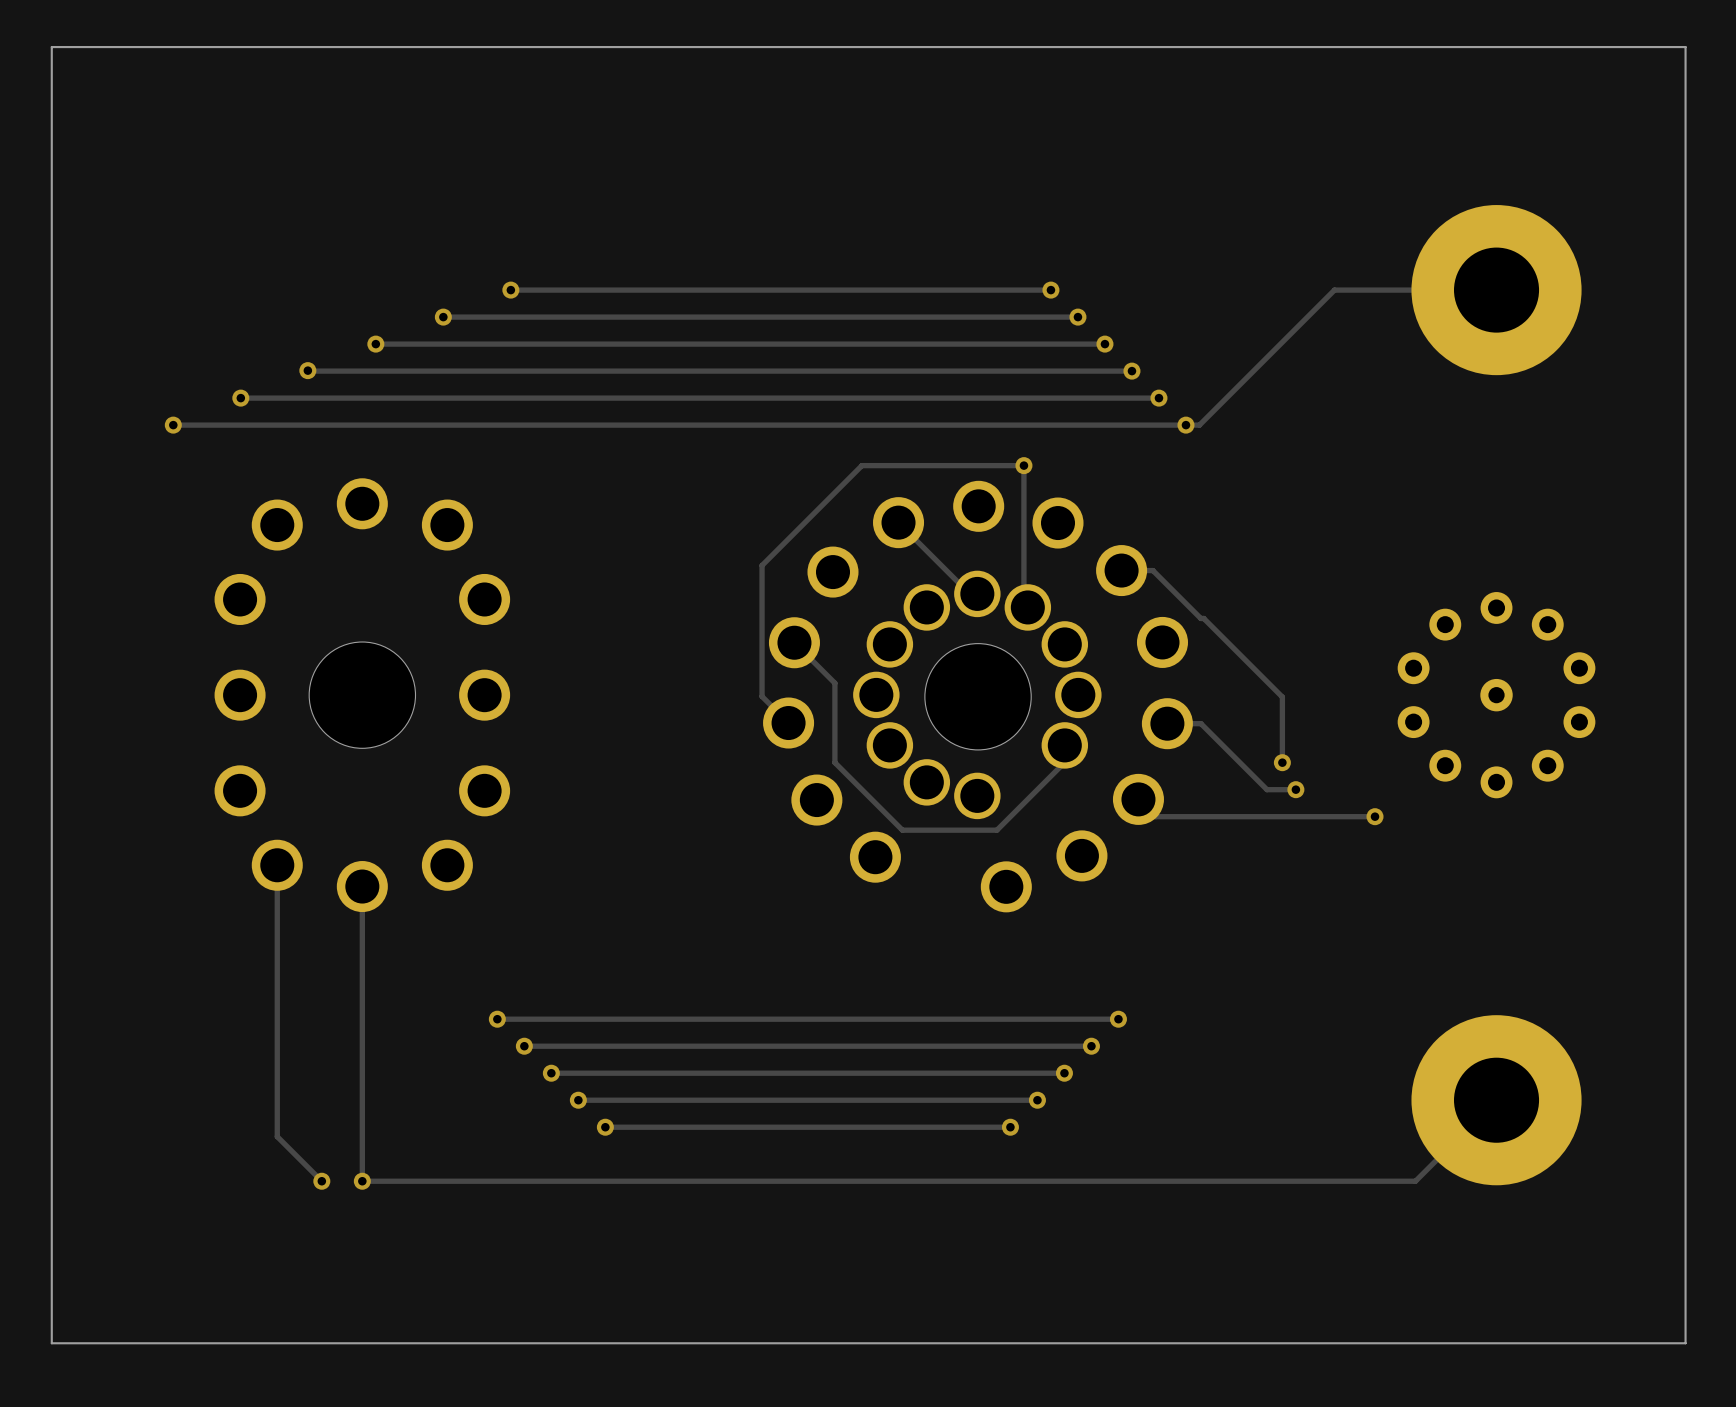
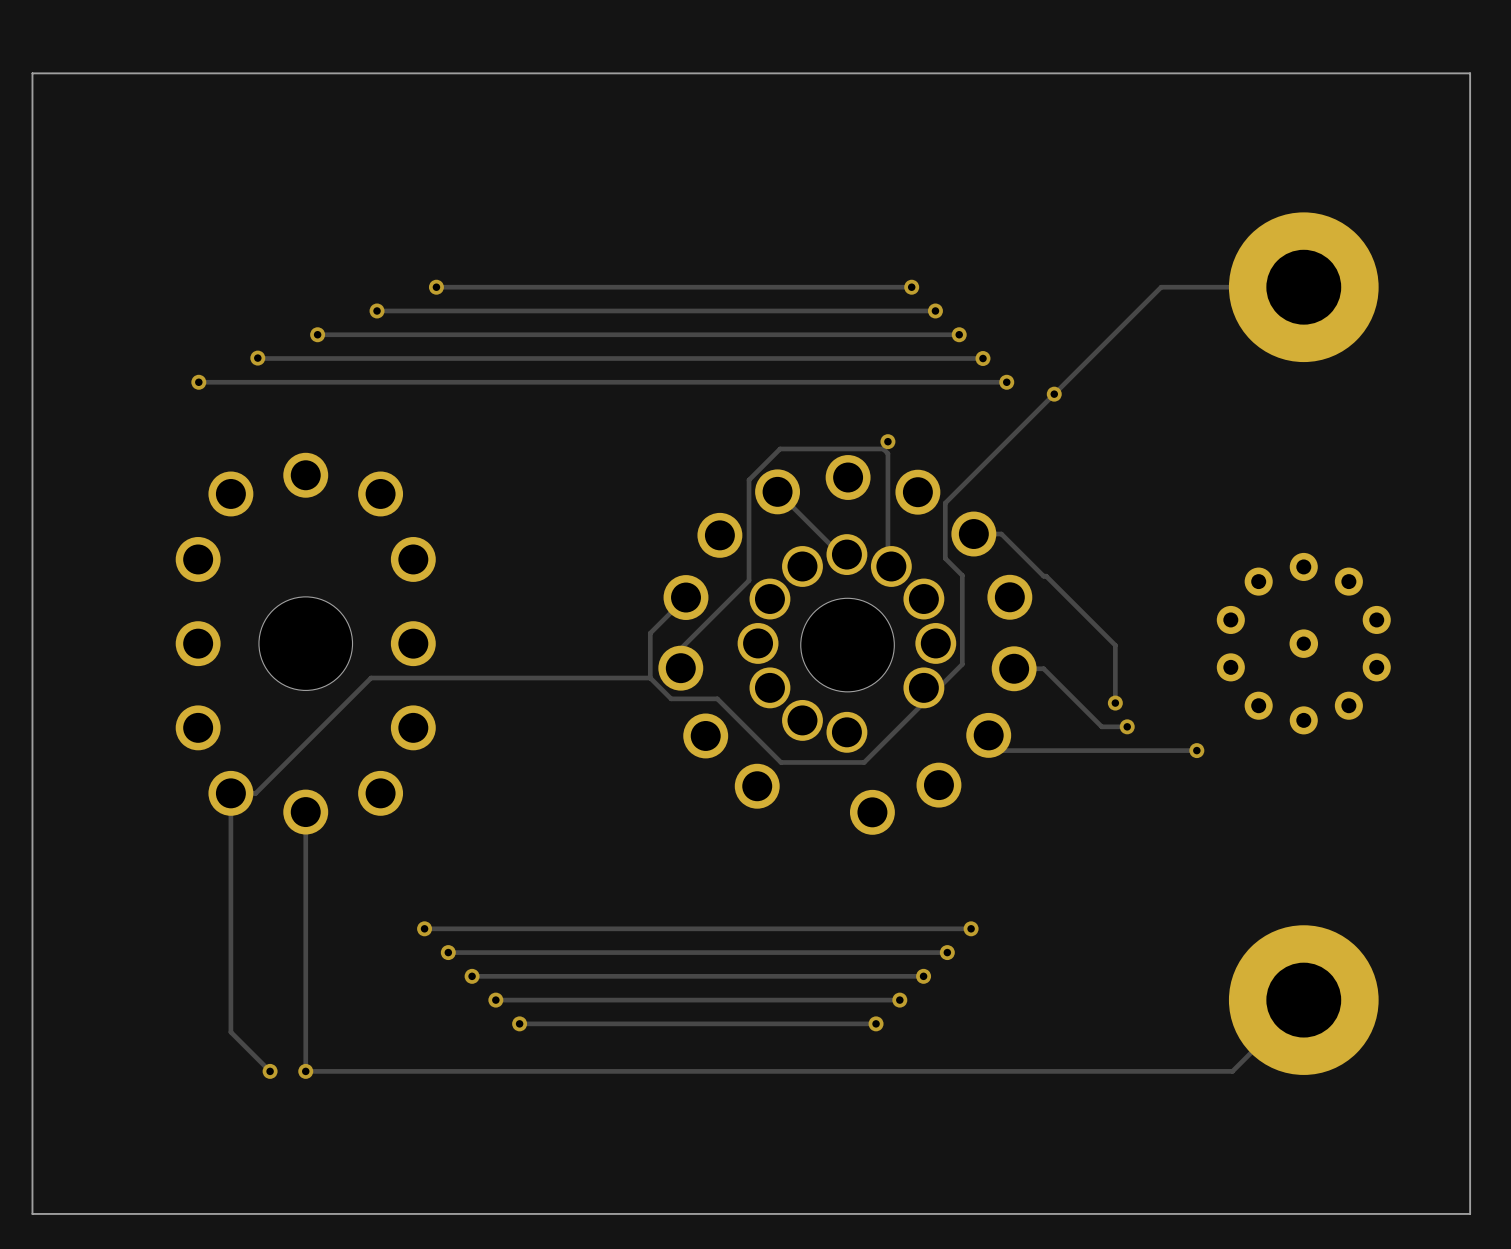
via: (173, 425) -> none
via position: (1185, 425) -> (1054, 394)
track: (1199, 425) (173, 425) -> (1042, 406) (945, 503) (945, 558) (962, 575) (962, 664) (938, 687) (923, 687)
track: (1023, 479) (1023, 465) (861, 465) (762, 565) (762, 696) (788, 723) -> (887, 453) (883, 448) (780, 448) (749, 480) (749, 580) (680, 648) (680, 668)
track: (794, 642) (834, 683) (834, 762) -> (685, 597) (650, 633) (650, 678)
track: none -> (650, 678) (371, 678) (255, 793) (230, 793)
track: none -> (650, 678) (671, 698) (717, 698) (721, 703)

